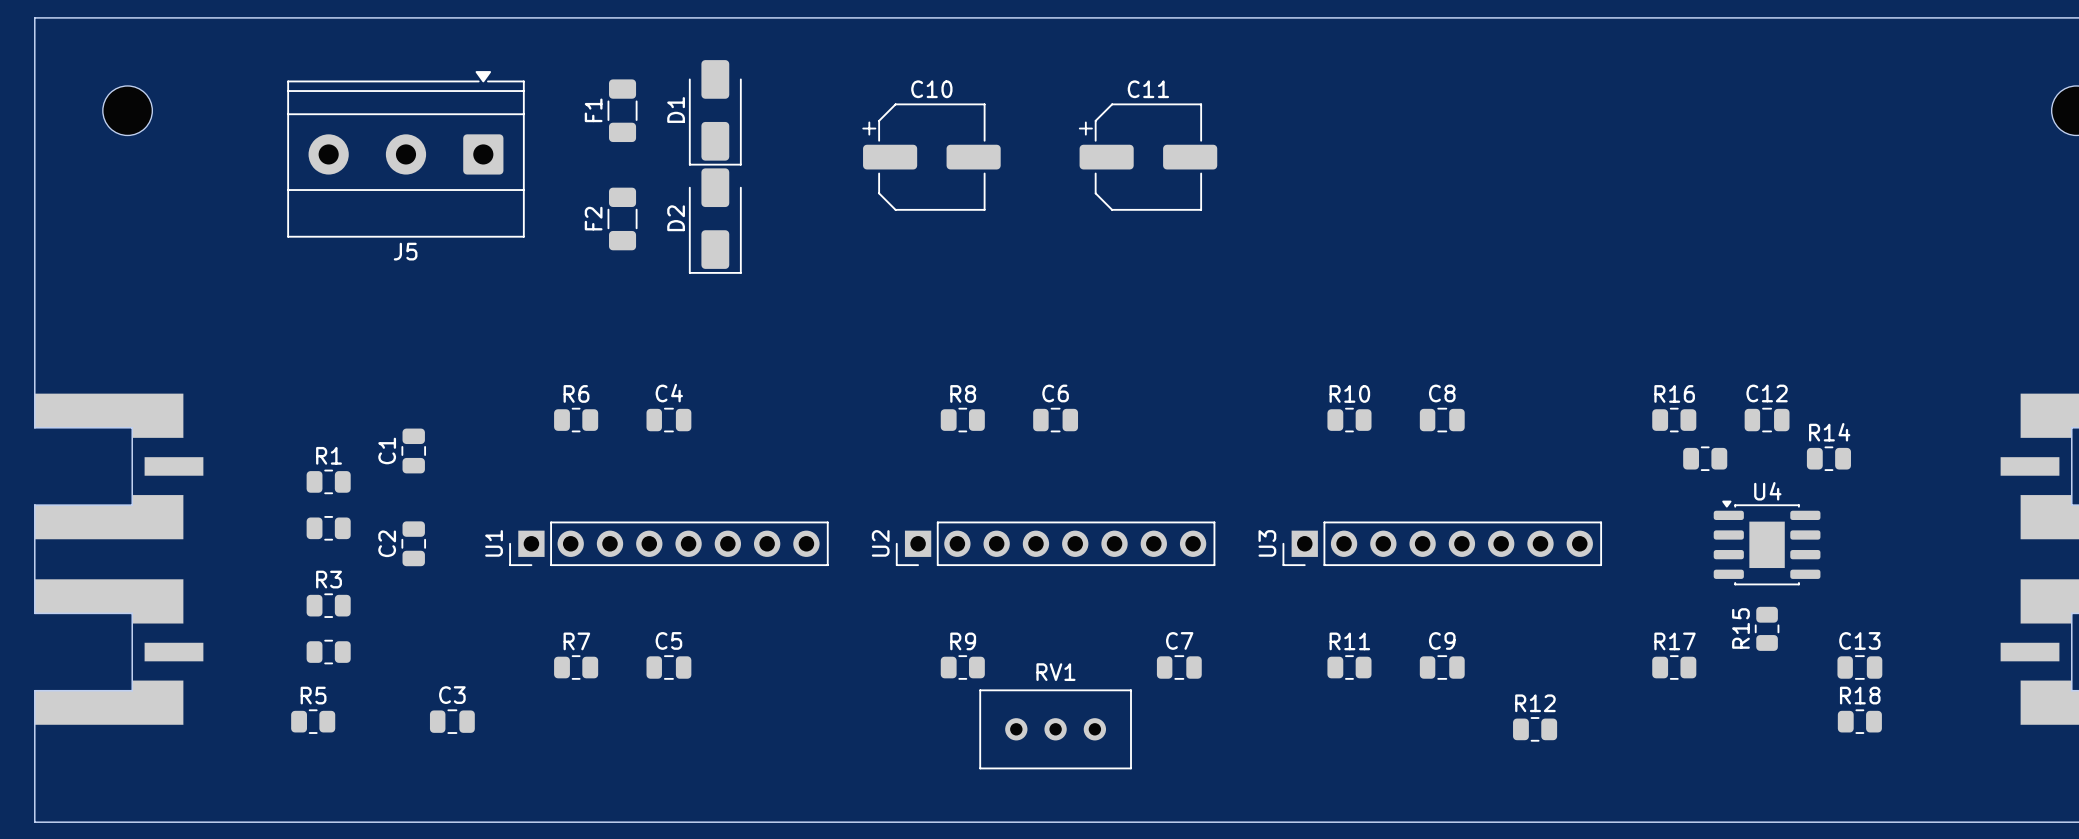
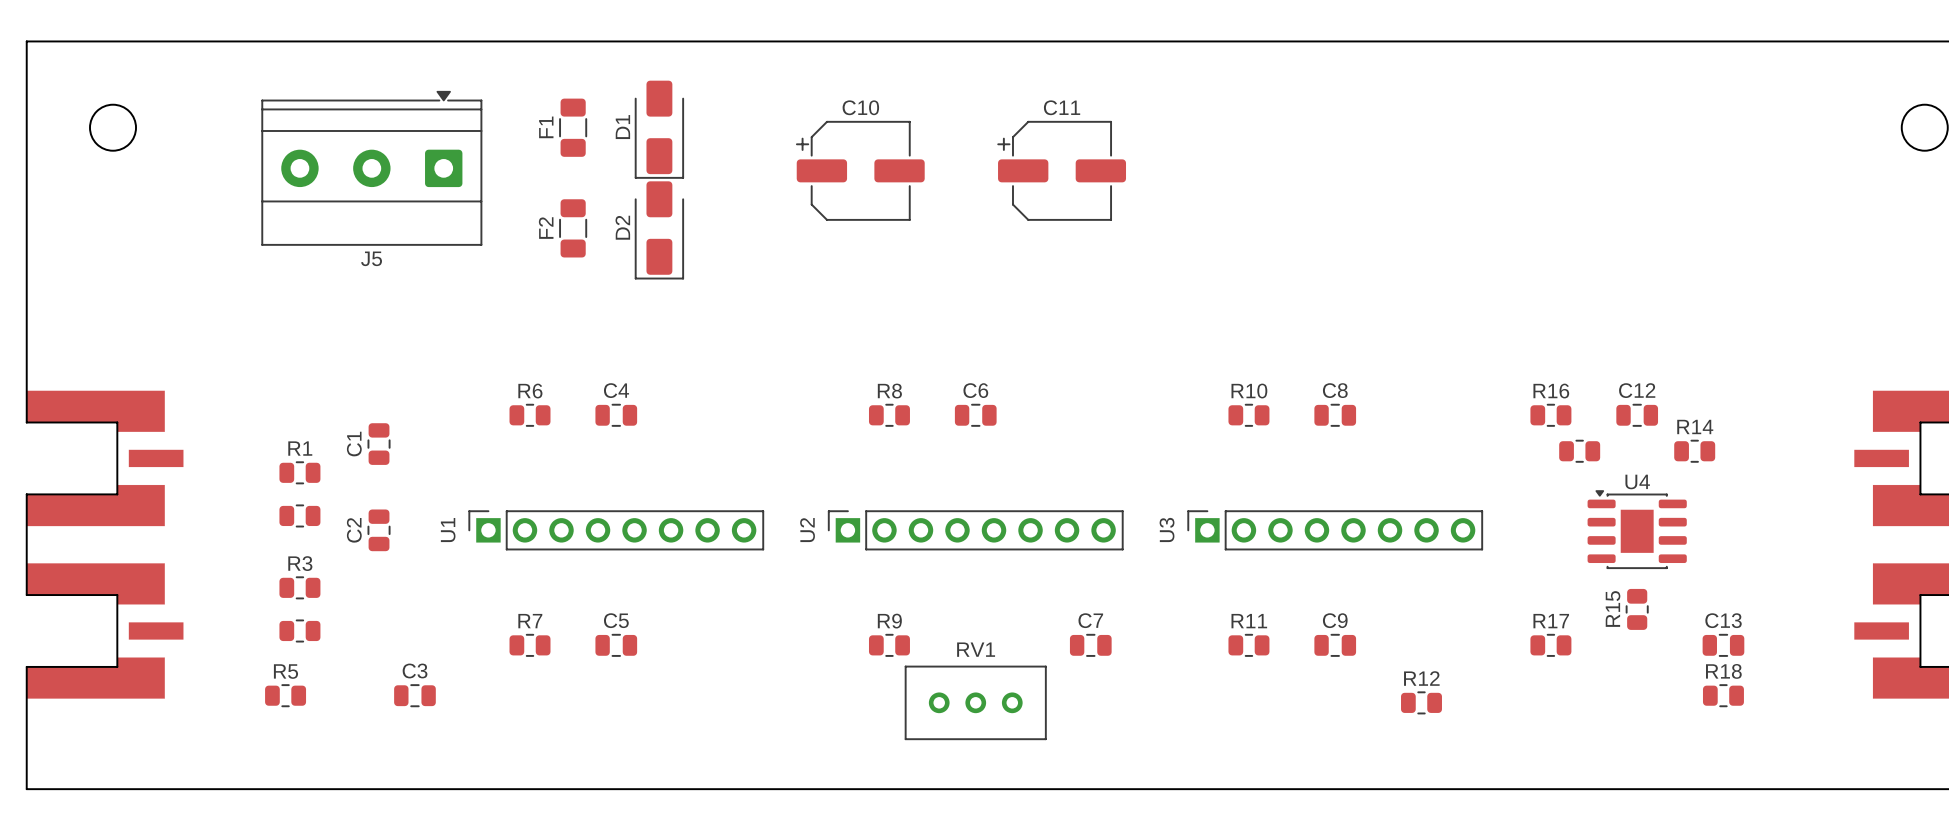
U1 footprint: [509, 521, 829, 567] -> [468, 510, 765, 551]
U2 footprint: [895, 521, 1216, 567] -> [827, 510, 1124, 551]
U3 footprint: [1282, 521, 1603, 567] -> [1187, 510, 1484, 551]

